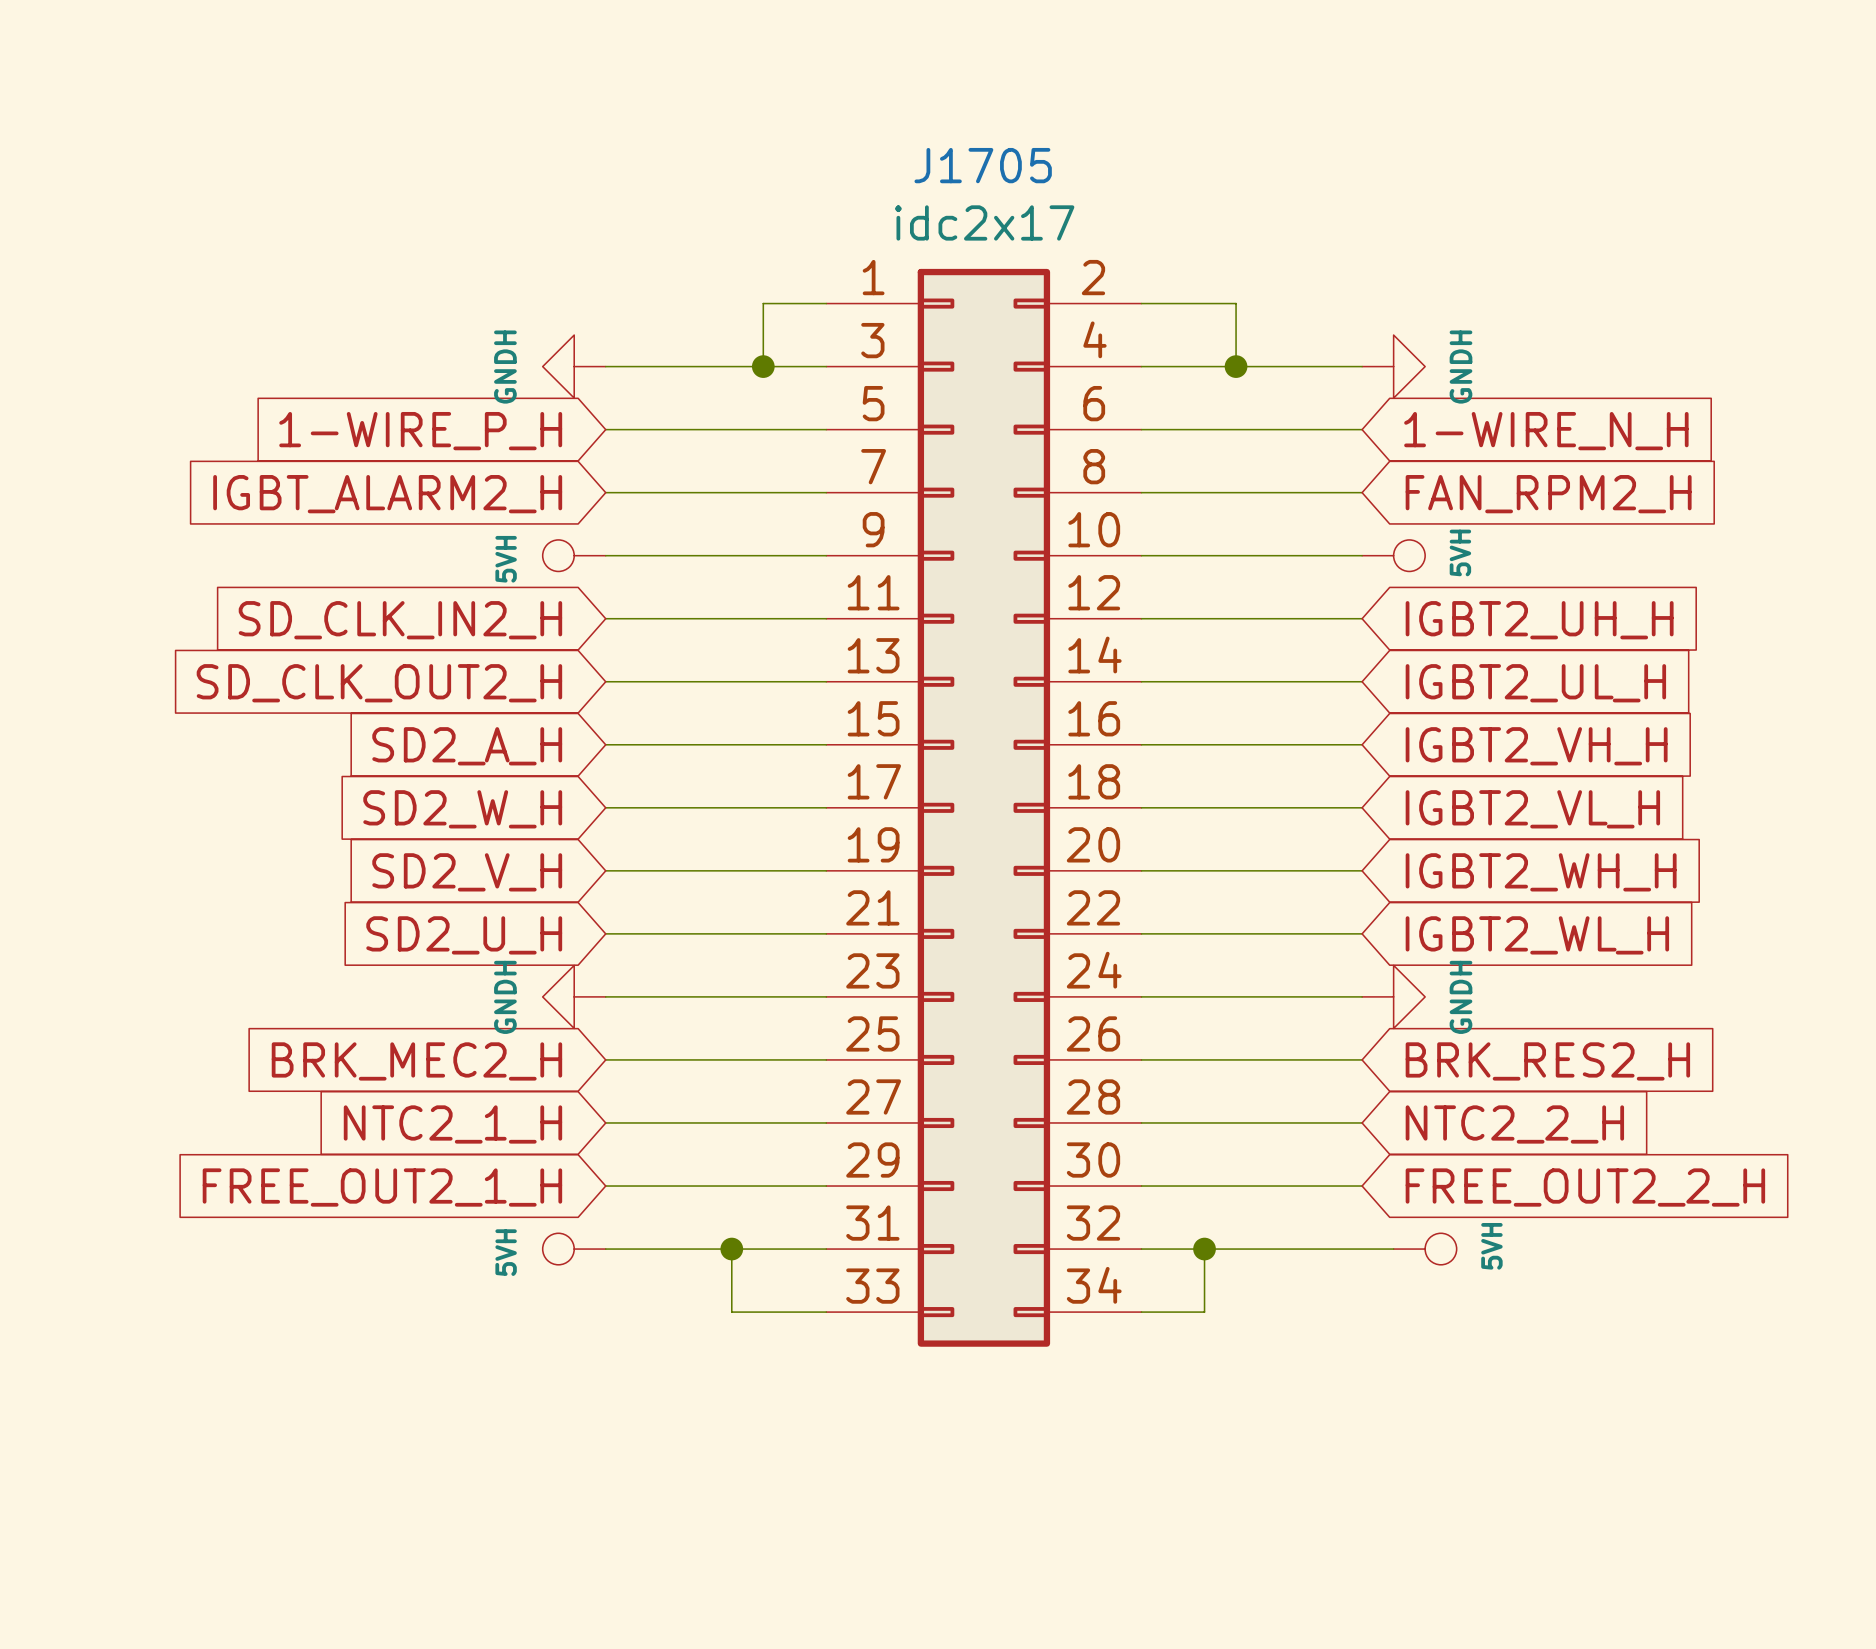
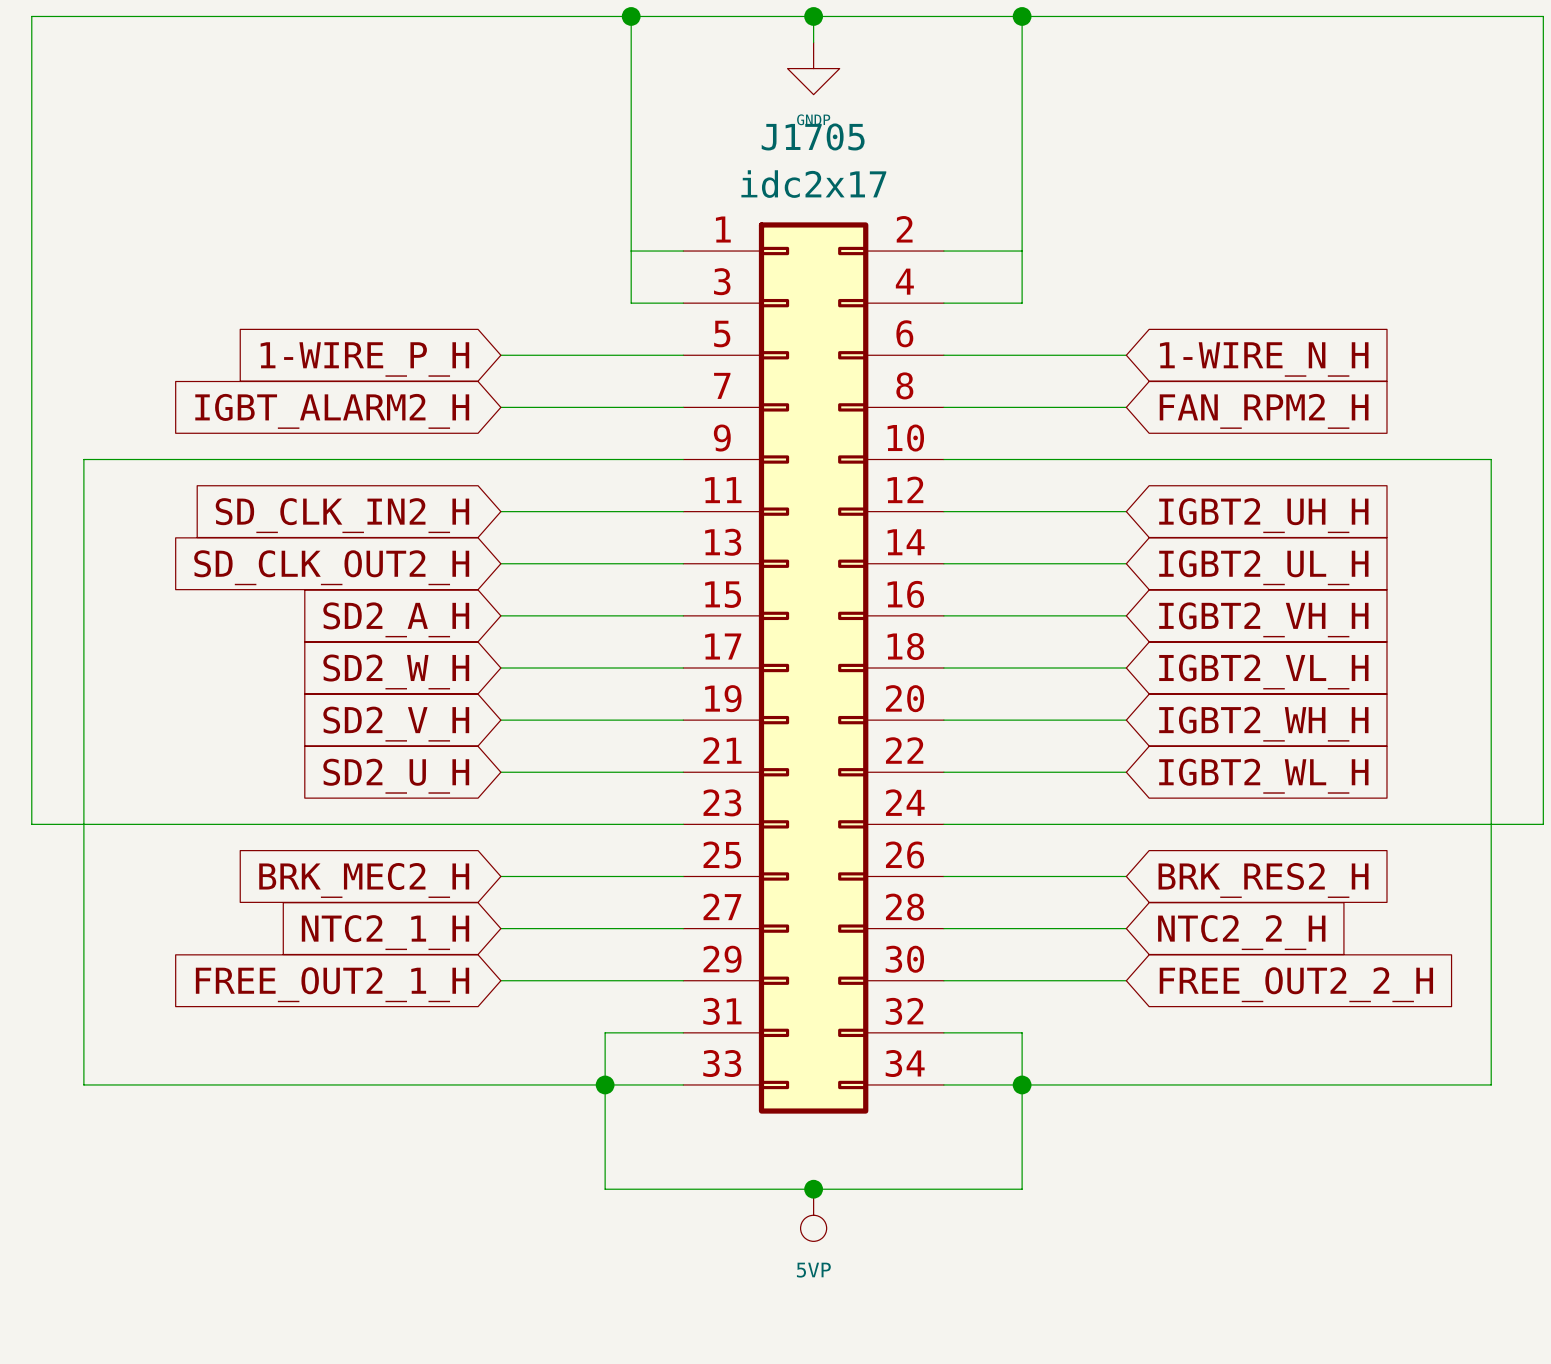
wire: none -> (631, 16) (631, 251)
junction: none -> (631, 16)
wire: none -> (813, 16) (813, 42)
junction: none -> (813, 16)
wire: none -> (1022, 16) (1022, 251)
junction: none -> (1022, 16)
power symbol: none -> GNDP (813, 68)
power symbol: GNDH (574, 366) -> none
wire: (605, 366) (763, 366) -> none
junction: (763, 366) -> none
wire: (1236, 366) (1362, 366) -> none
junction: (1236, 366) -> none
power symbol: GNDH (1393, 366) -> none
power symbol: 5VH (574, 555) -> none
power symbol: 5VH (1393, 555) -> none
power symbol: GNDH (574, 996) -> none
wire: none -> (500, 824) (31, 824) (31, 16) (1543, 16) (1543, 824) (1126, 824)
power symbol: GNDH (1393, 996) -> none
power symbol: 5VH (574, 1249) -> none
wire: (605, 1249) (731, 1249) -> none
junction position: (731, 1249) -> (605, 1084)
wire: (1204, 1249) (1204, 1312) -> (1126, 459) (1491, 459) (1491, 1084) (996, 1084)
junction position: (1204, 1249) -> (1022, 1084)
wire: (1236, 1249) (1393, 1249) -> (1022, 1032) (1022, 1189) (605, 1189) (605, 1084) (83, 1084) (83, 459) (500, 459)
power symbol: 5VH (1425, 1249) -> none
junction: none -> (813, 1189)
power symbol: none -> 5VP (813, 1215)

